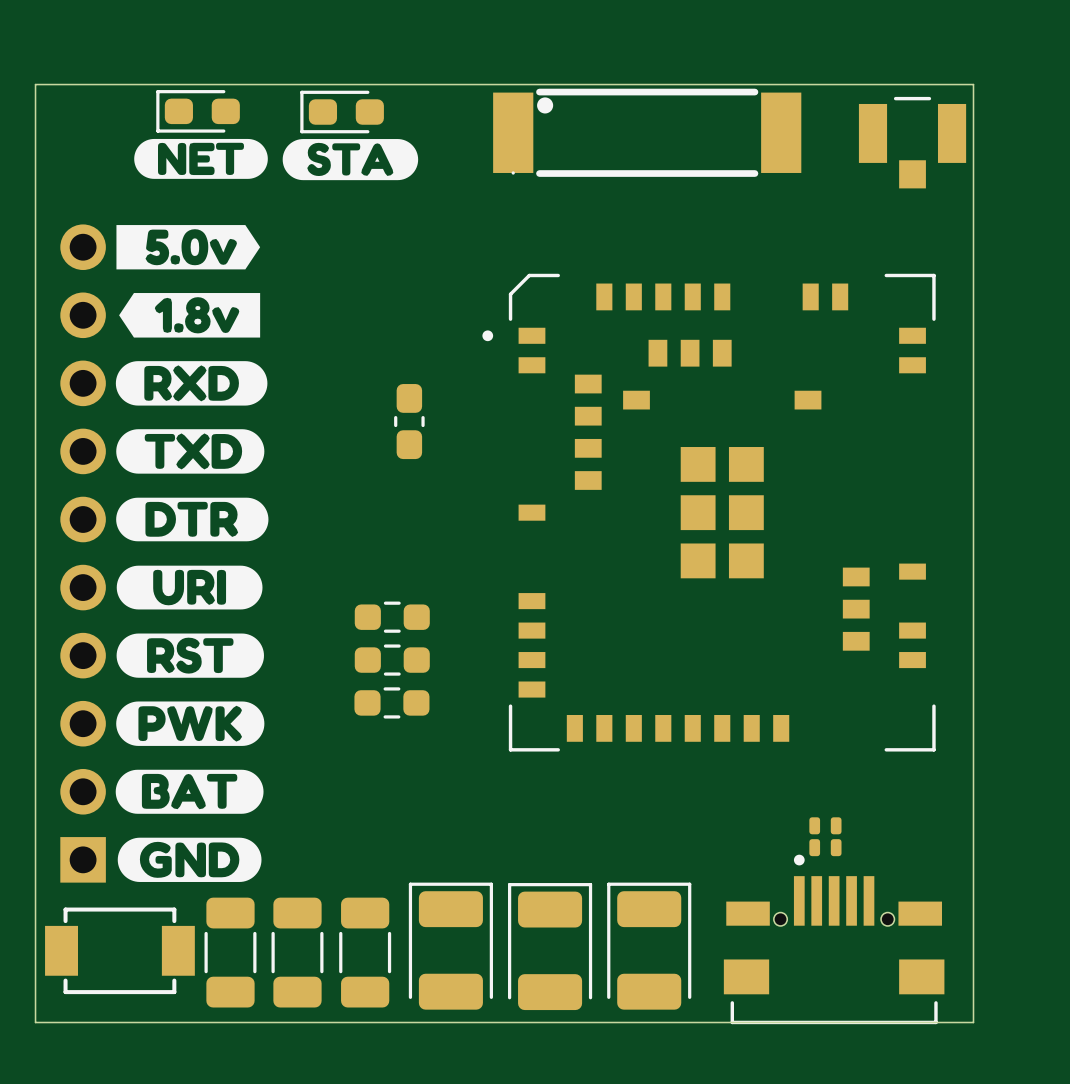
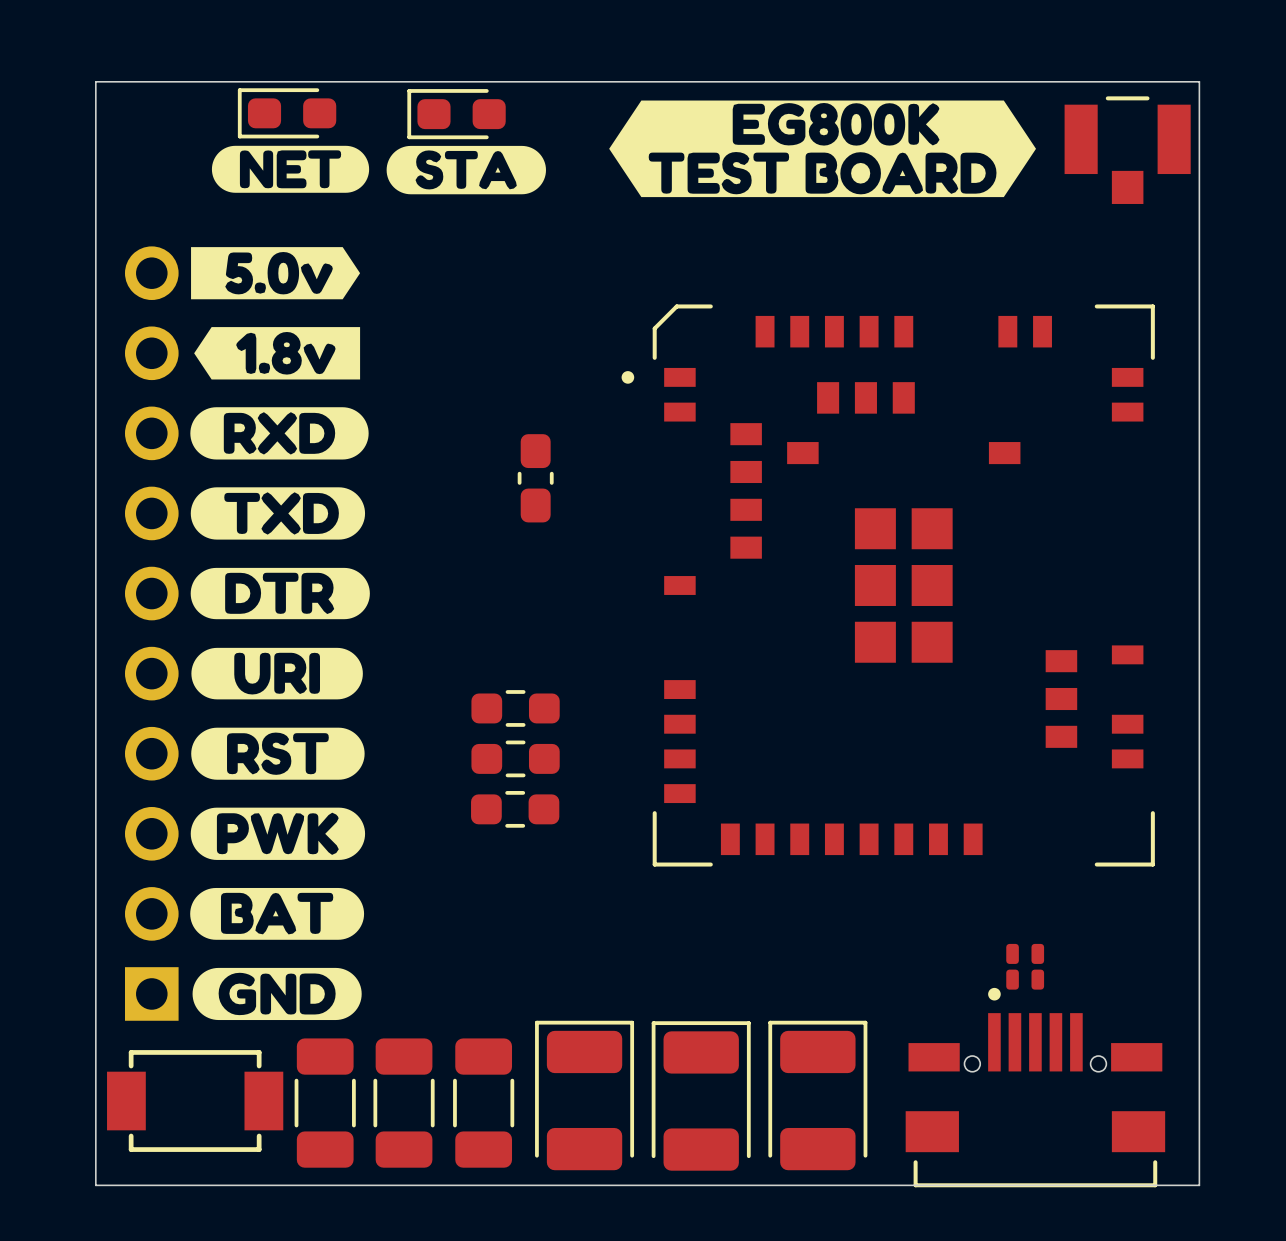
drawing: none -> [609, 100, 1037, 198]
part: (647, 132) -> none

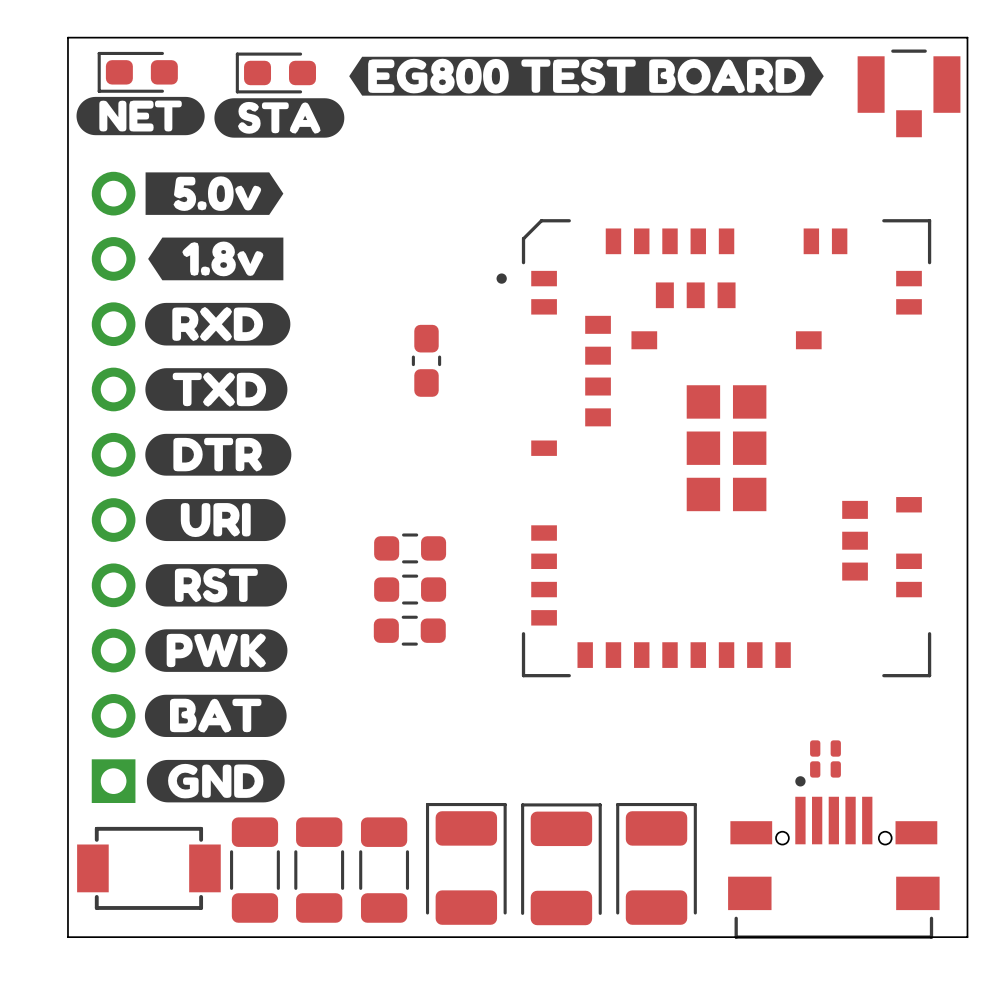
drawing: [609, 100, 1037, 198] -> none
drawing: none -> [349, 56, 824, 96]
part: (287, 113) -> none
part: (456, 114) -> none
part: none -> (137, 72)
part: none -> (275, 72)
drawing position: (290, 169) -> (140, 116)
drawing position: (466, 170) -> (279, 117)

